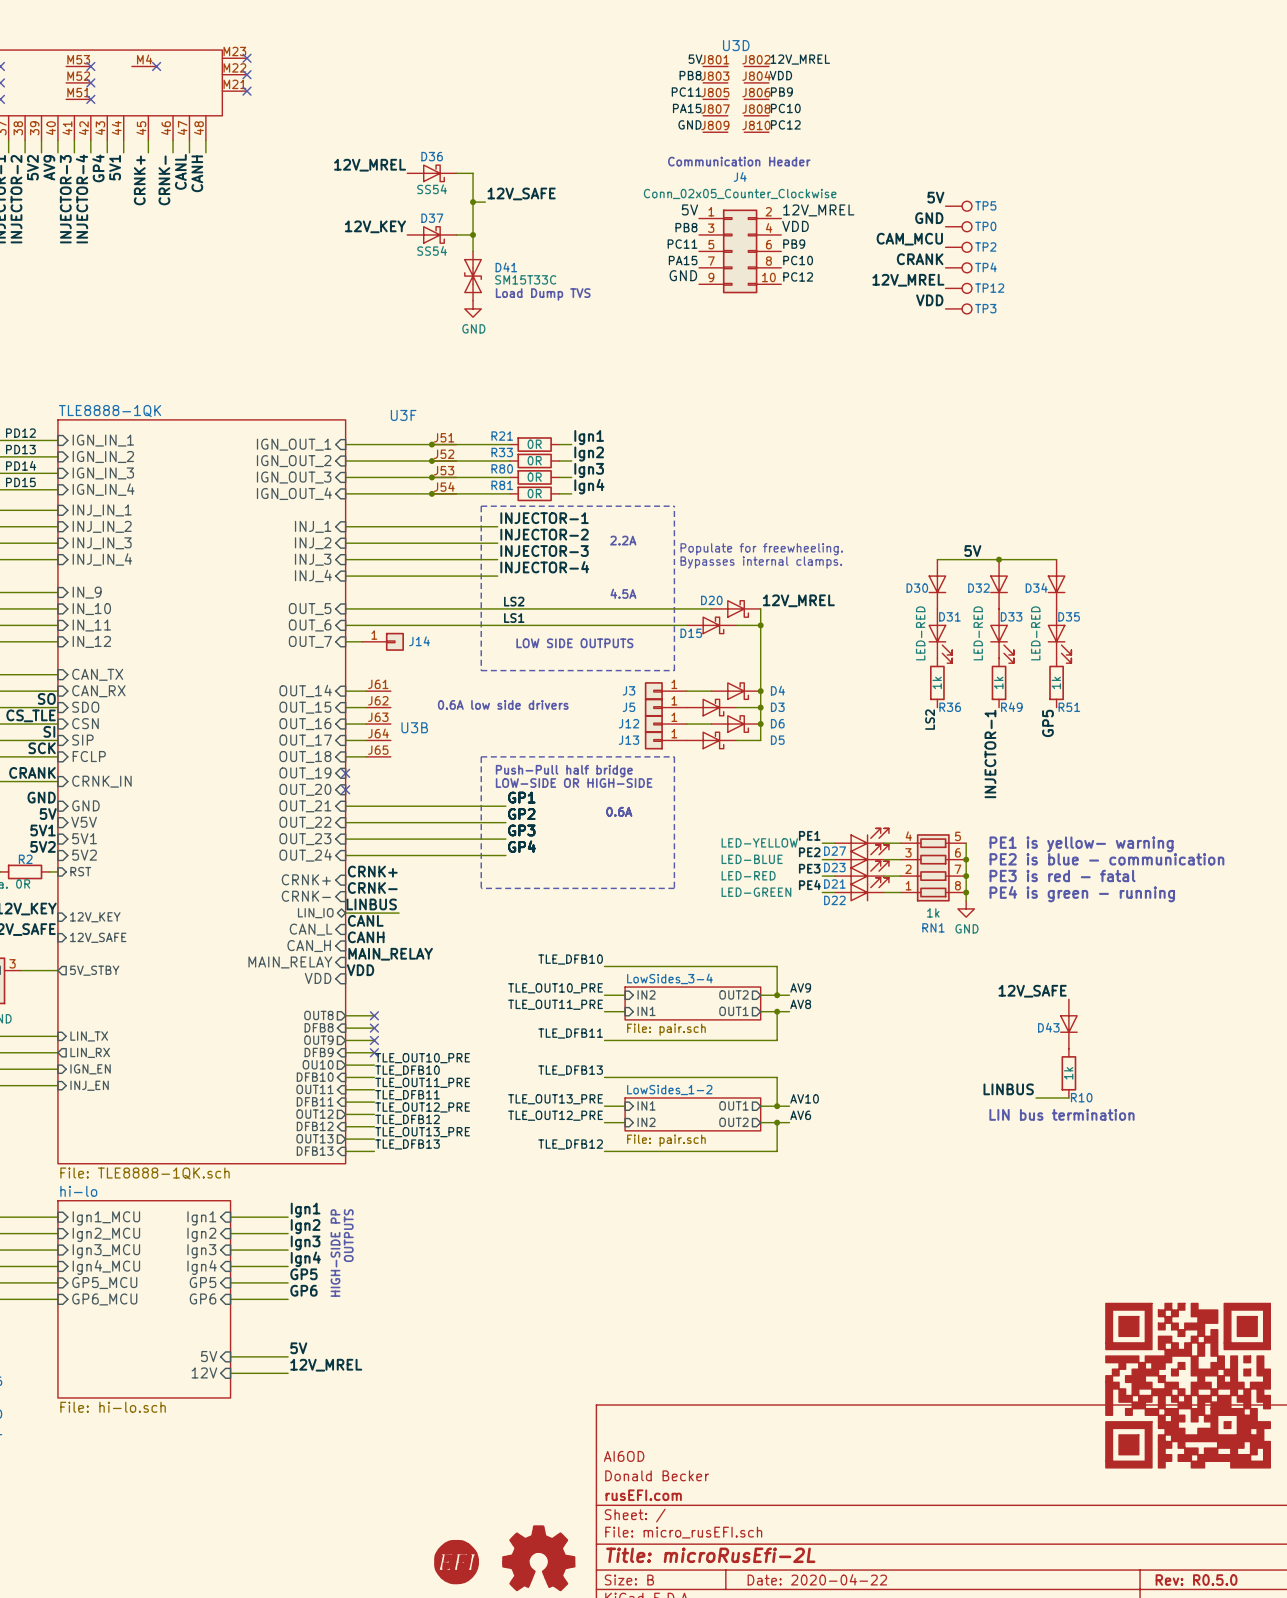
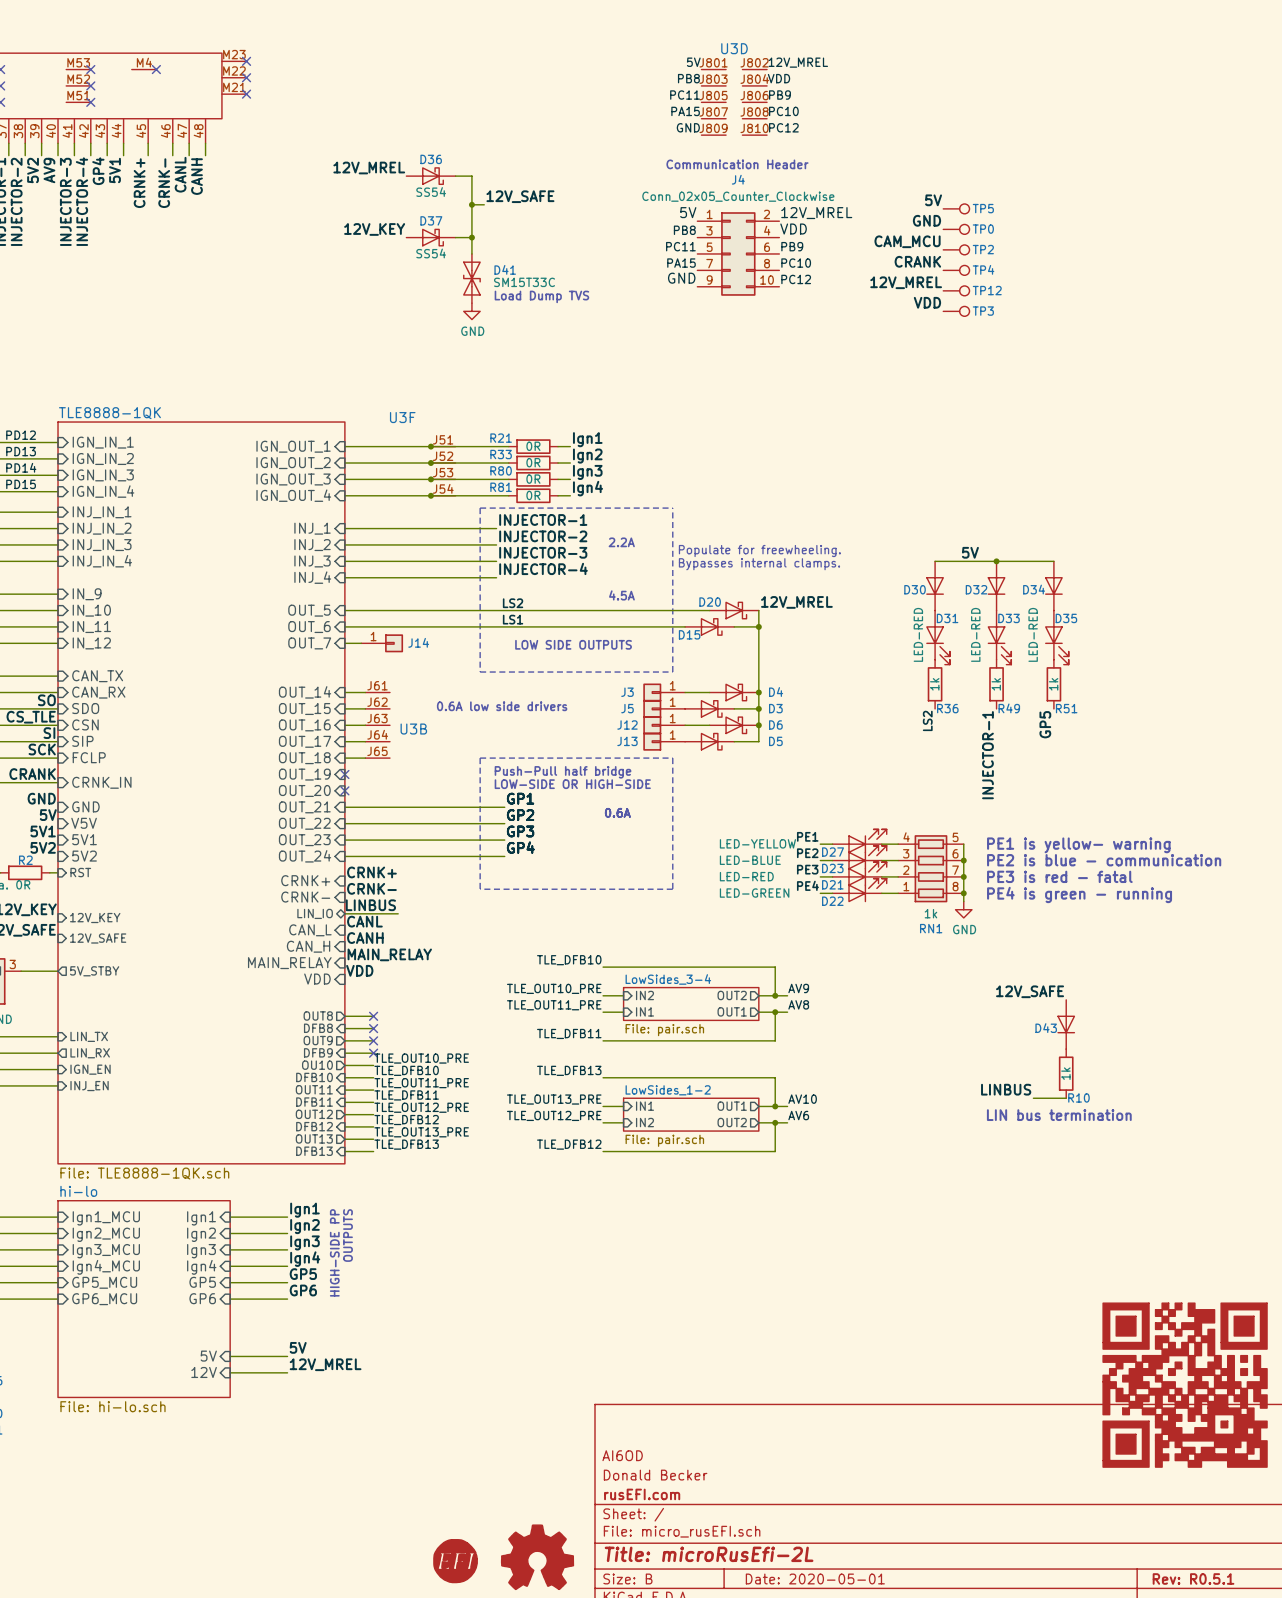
title block: Date: 2020-04-22 (817, 1579) -> Date: 2020-05-01 (815, 1578)
title block: Rev: R0.5.0 (1196, 1580) -> Rev: R0.5.1 (1193, 1578)

